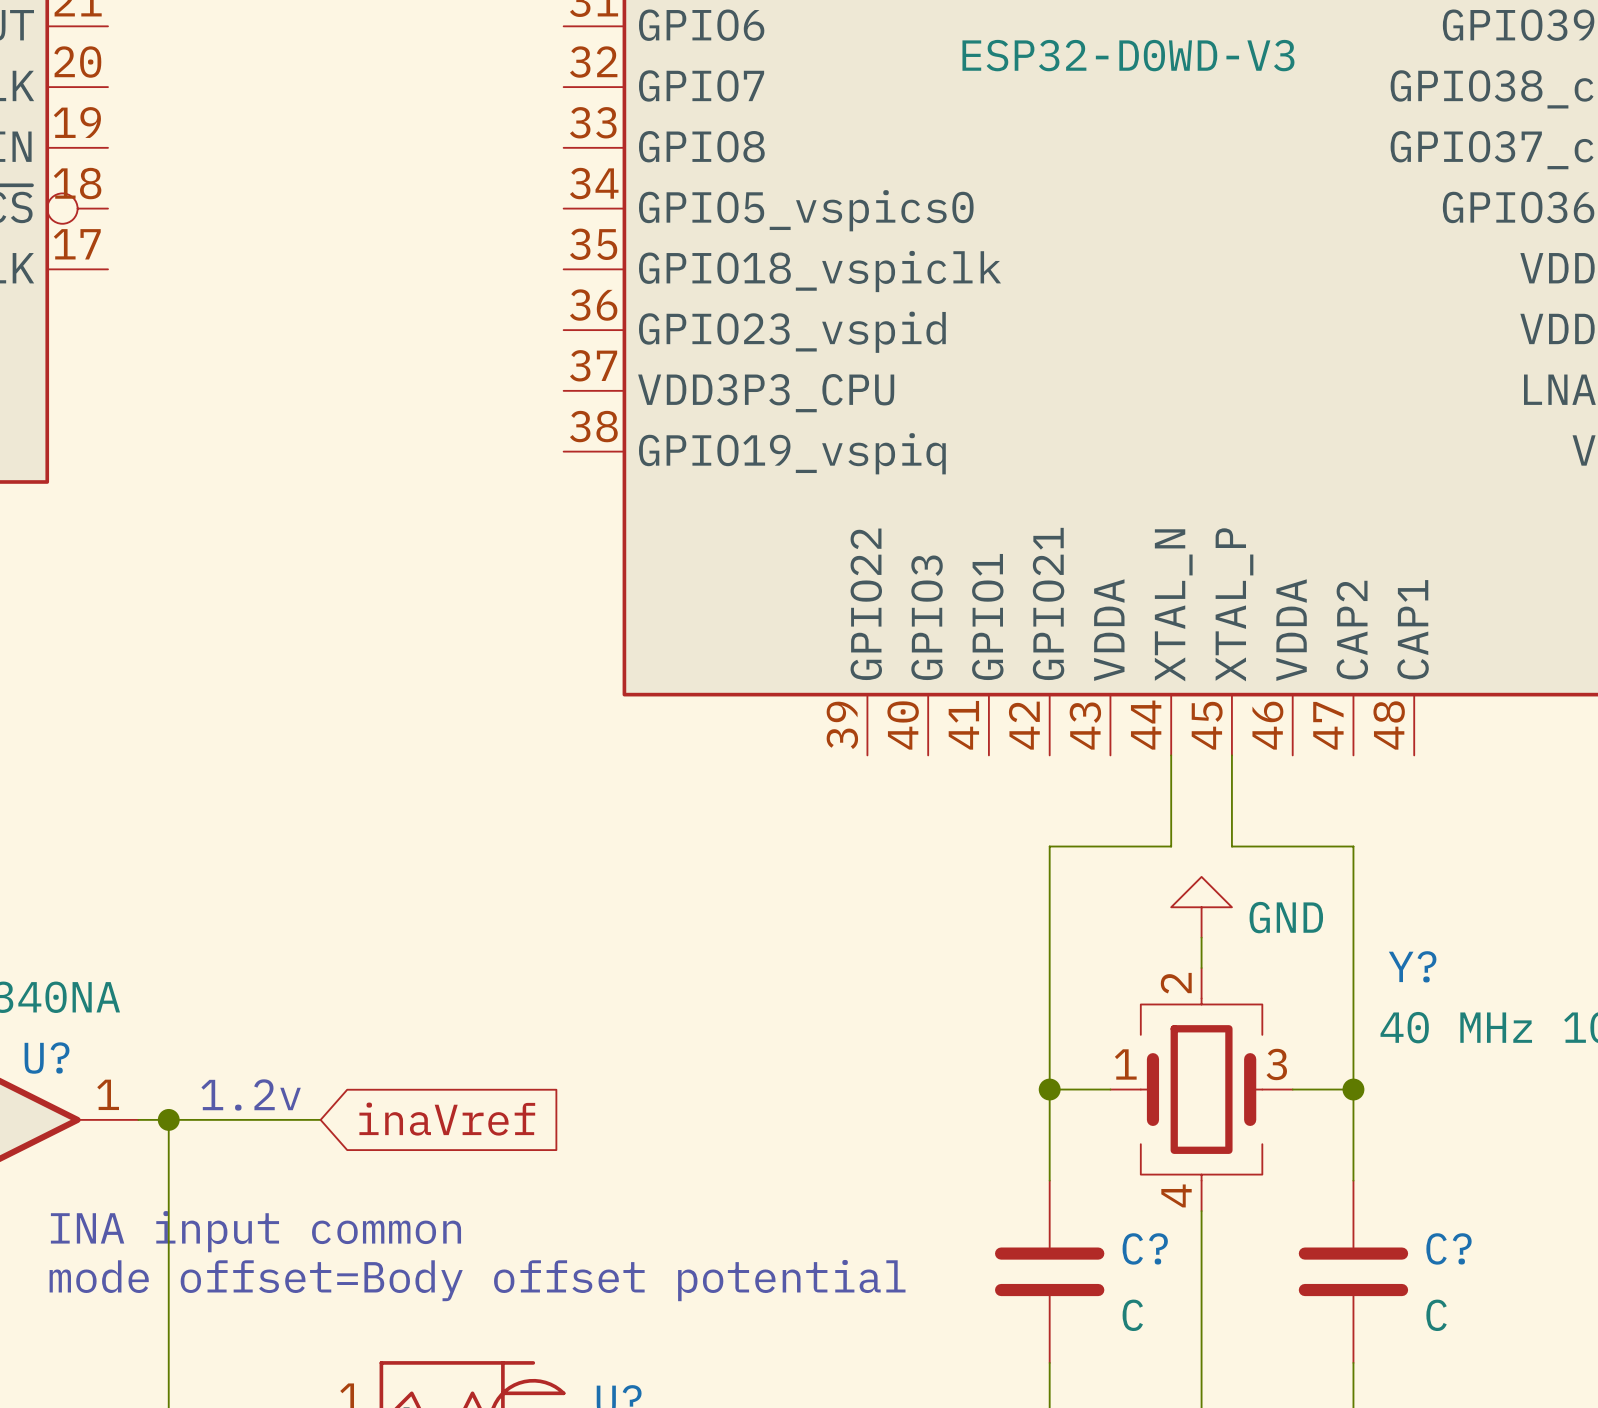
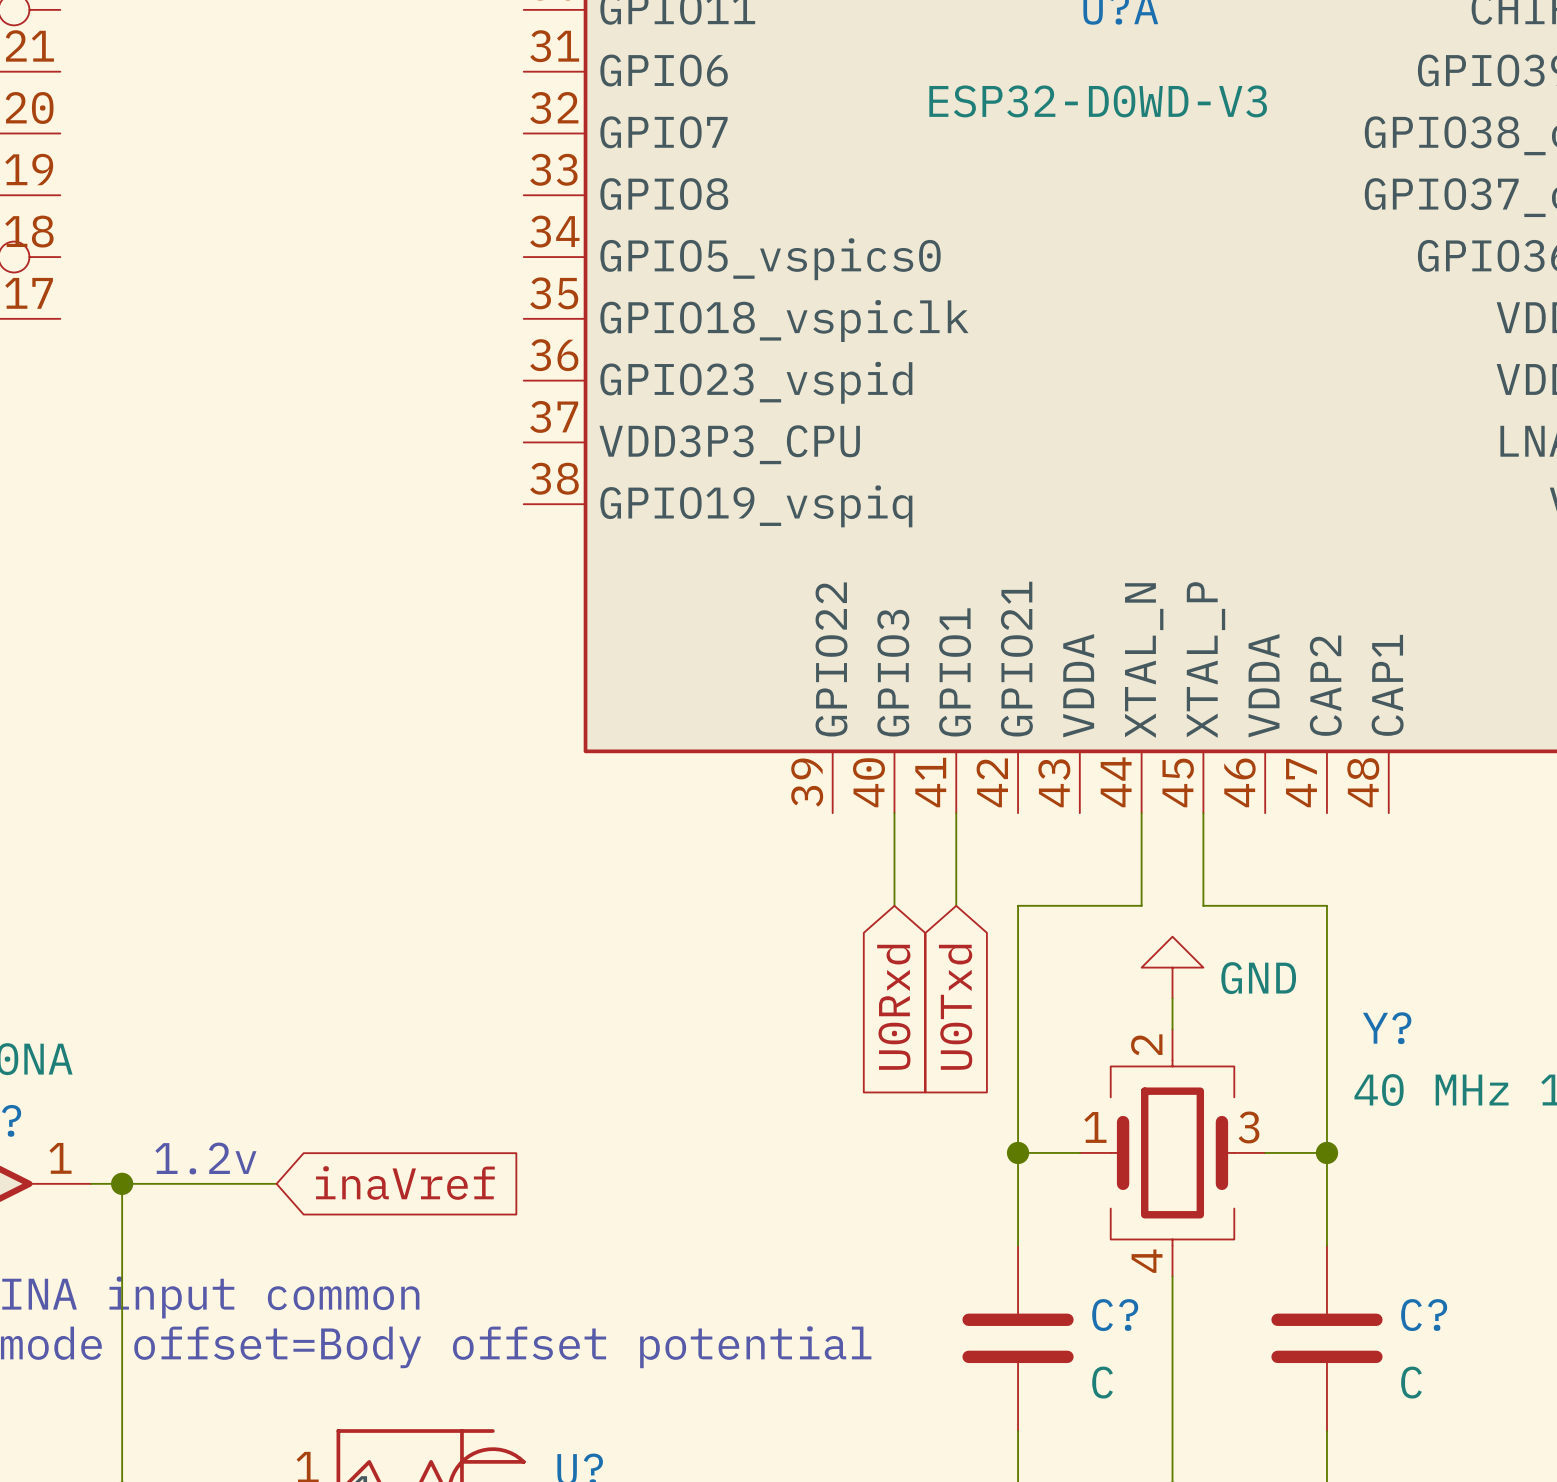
wire: none -> (894, 813) (894, 905)
wire: none -> (956, 813) (956, 905)
global label: none -> U0Rxd (893, 1007)
global label: none -> U0Txd (955, 1007)

